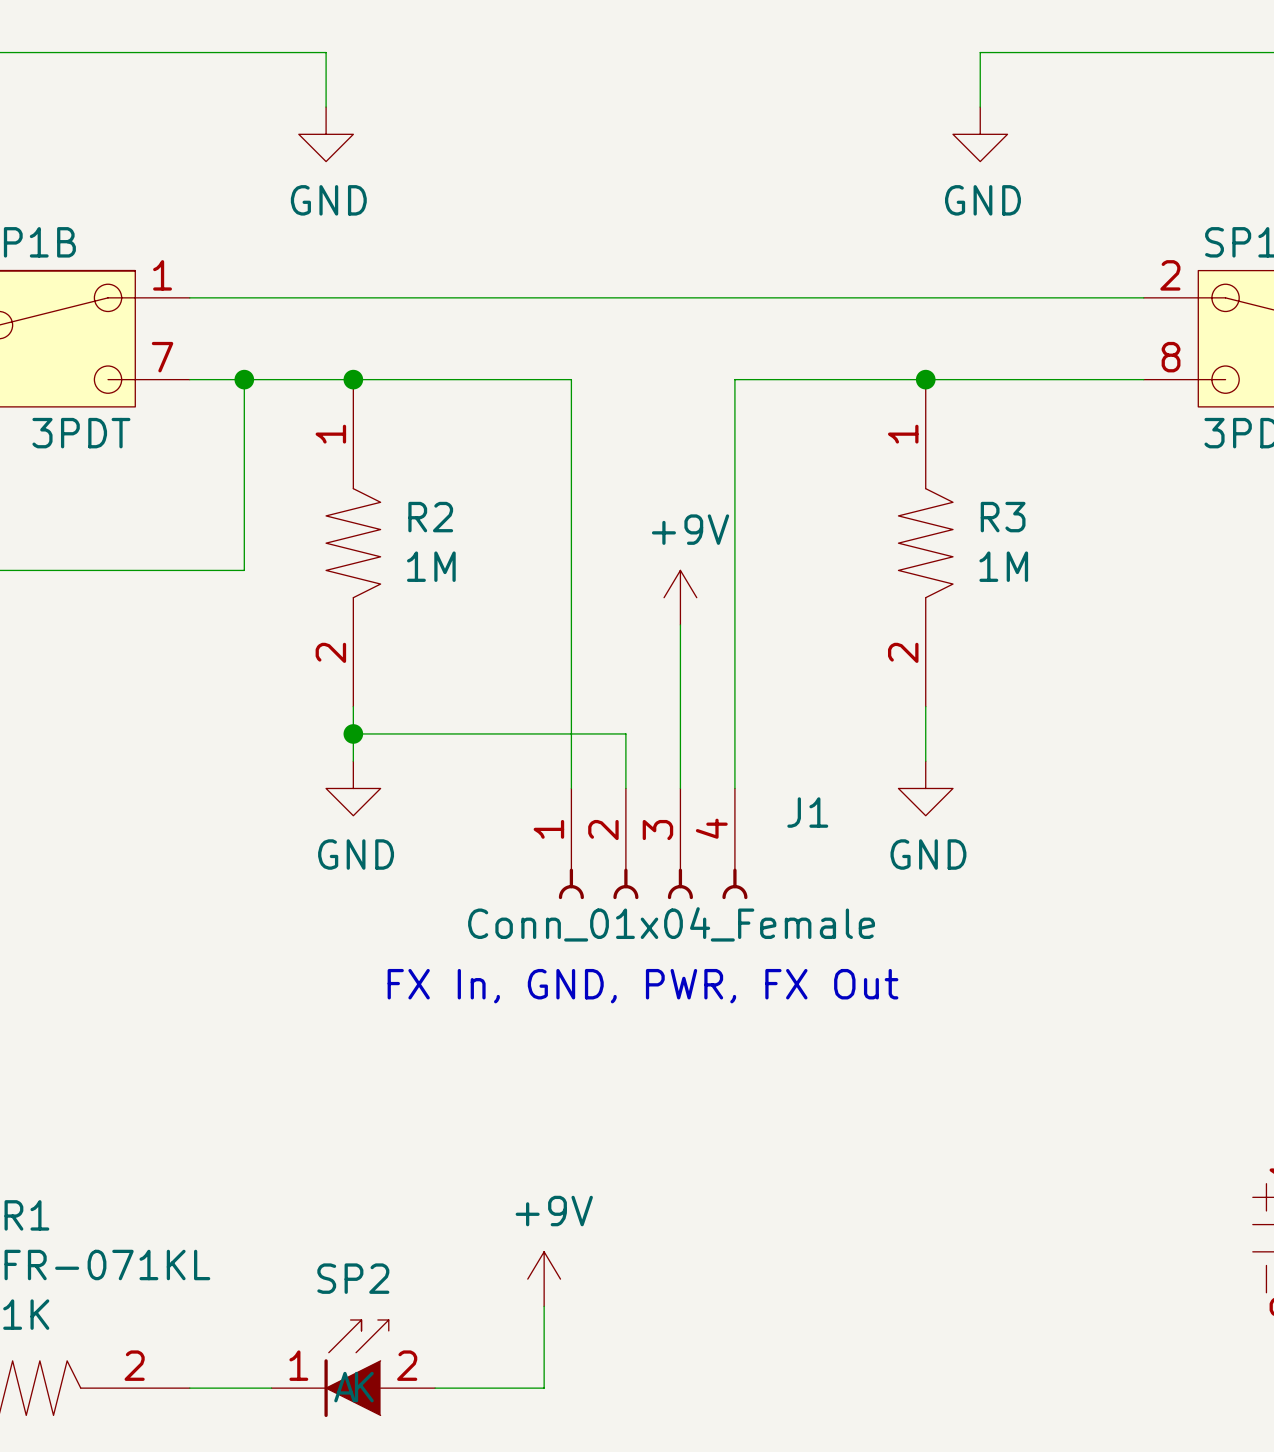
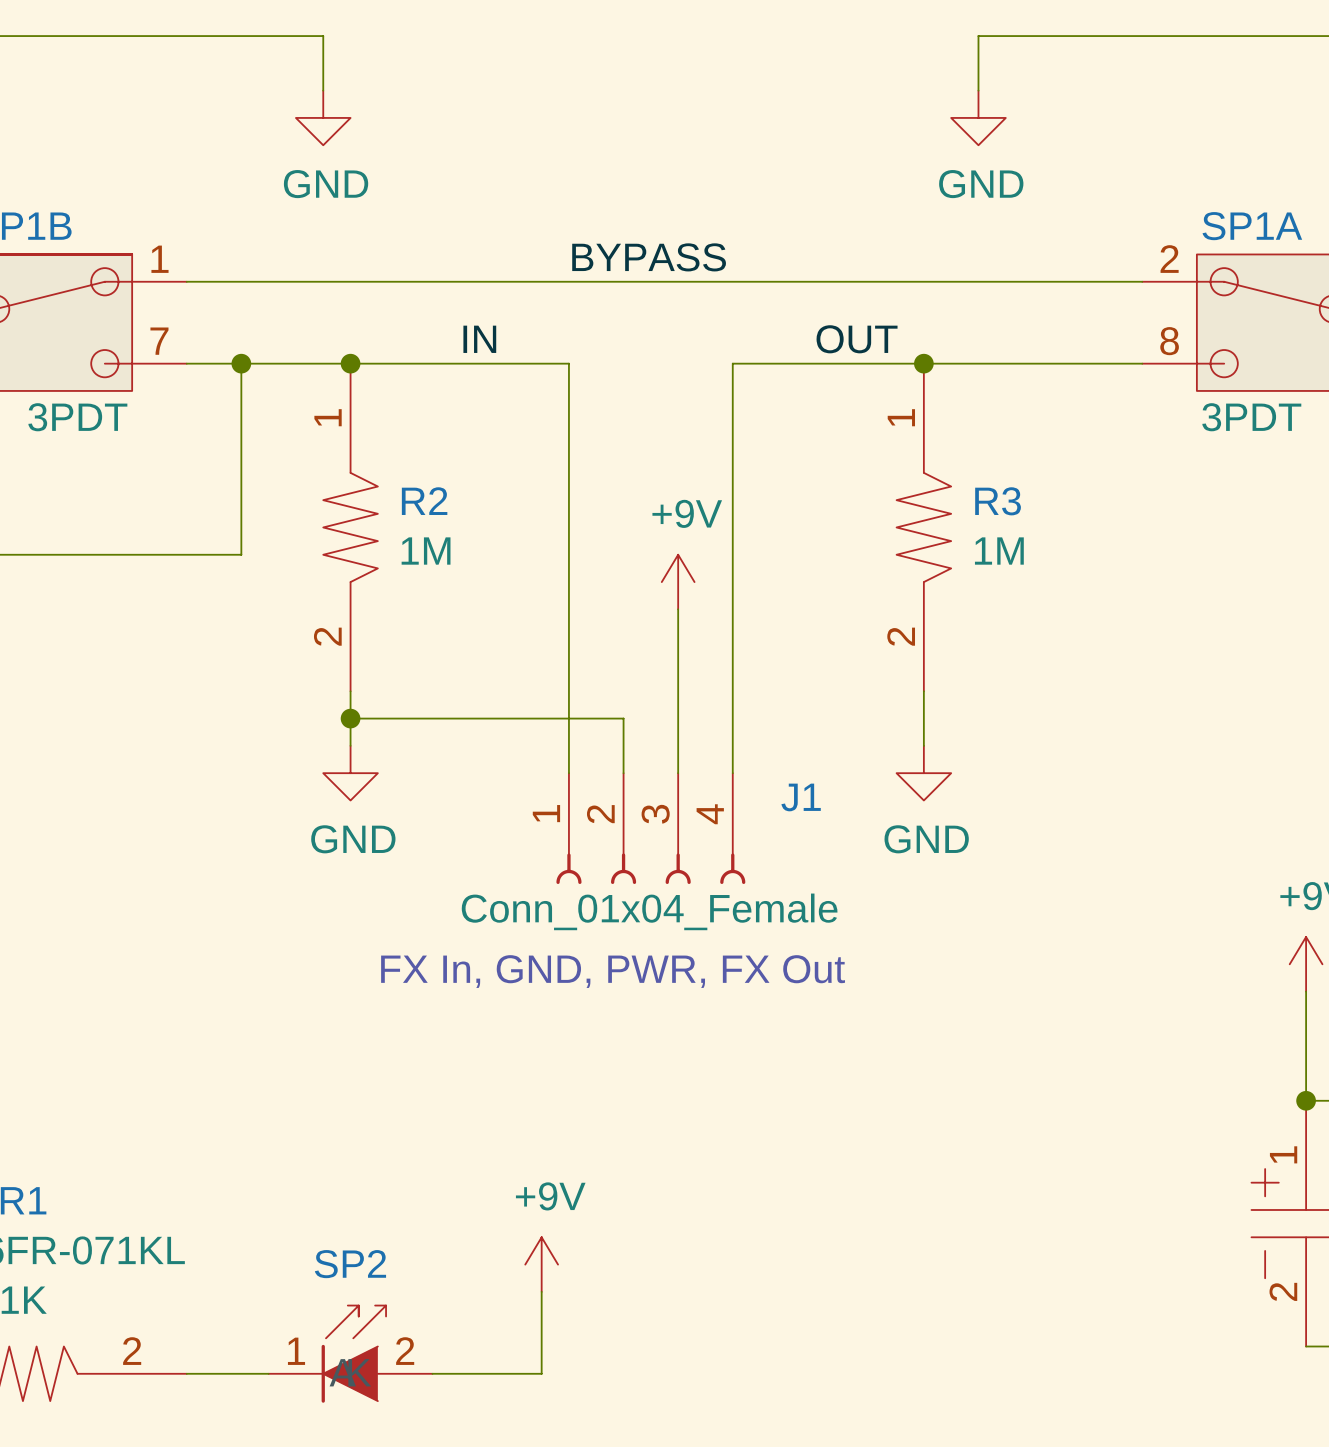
label: none -> BYPASS (649, 257)
label: none -> IN (479, 339)
label: none -> OUT (857, 339)

